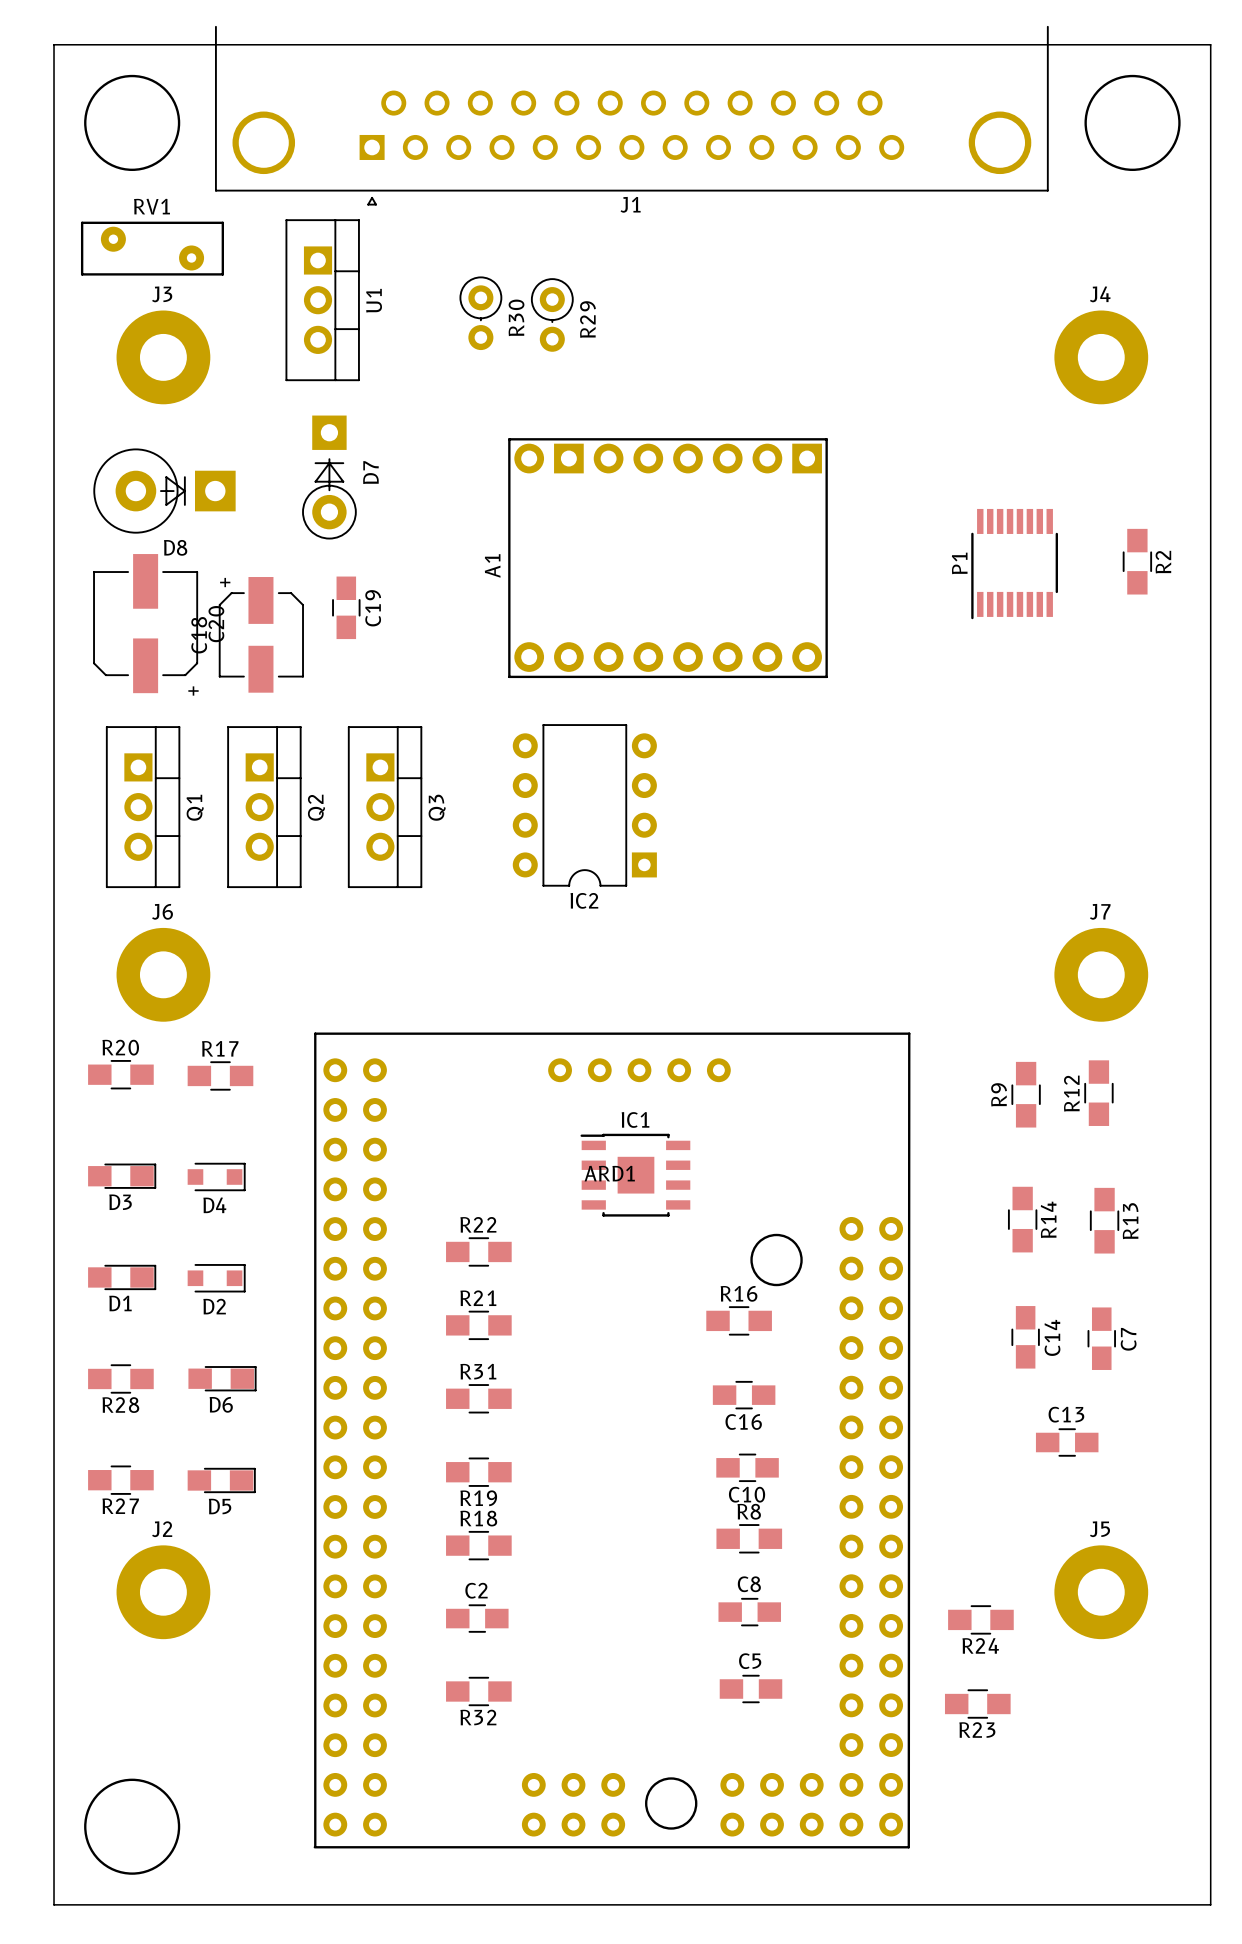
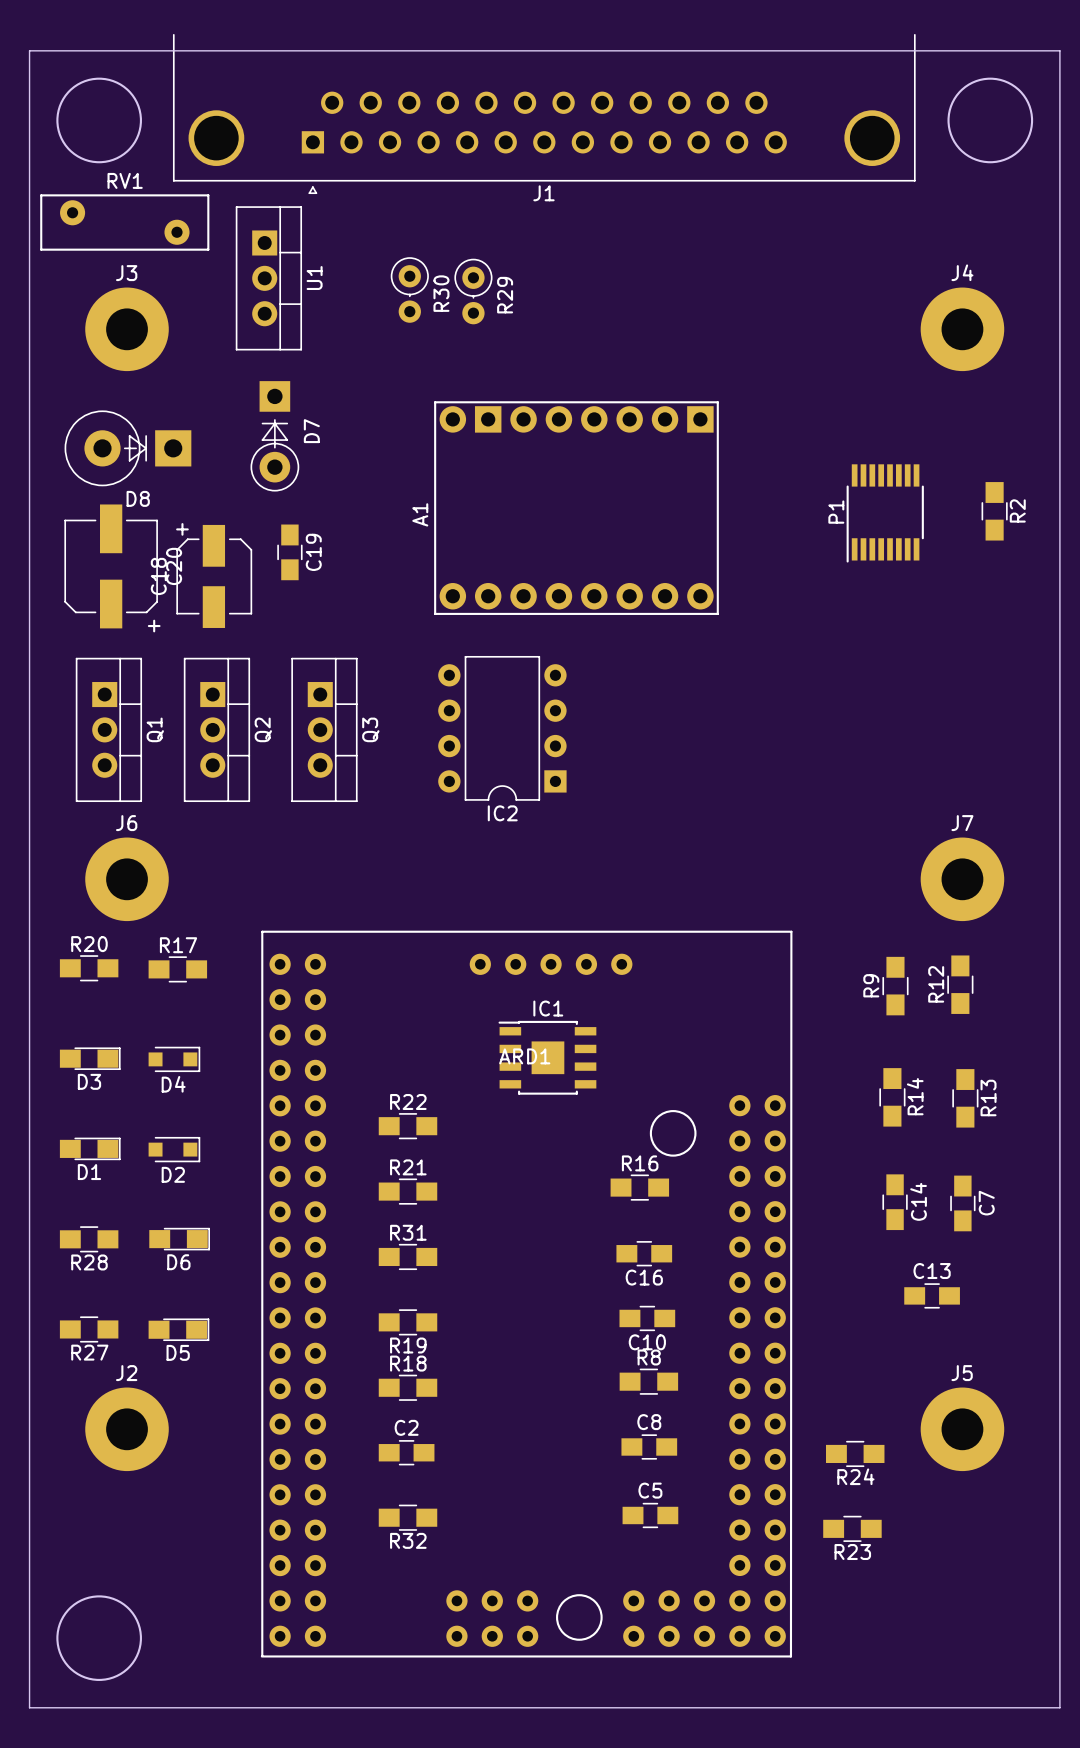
RV1 footprint: [80, 221, 224, 276] -> [40, 194, 210, 251]

